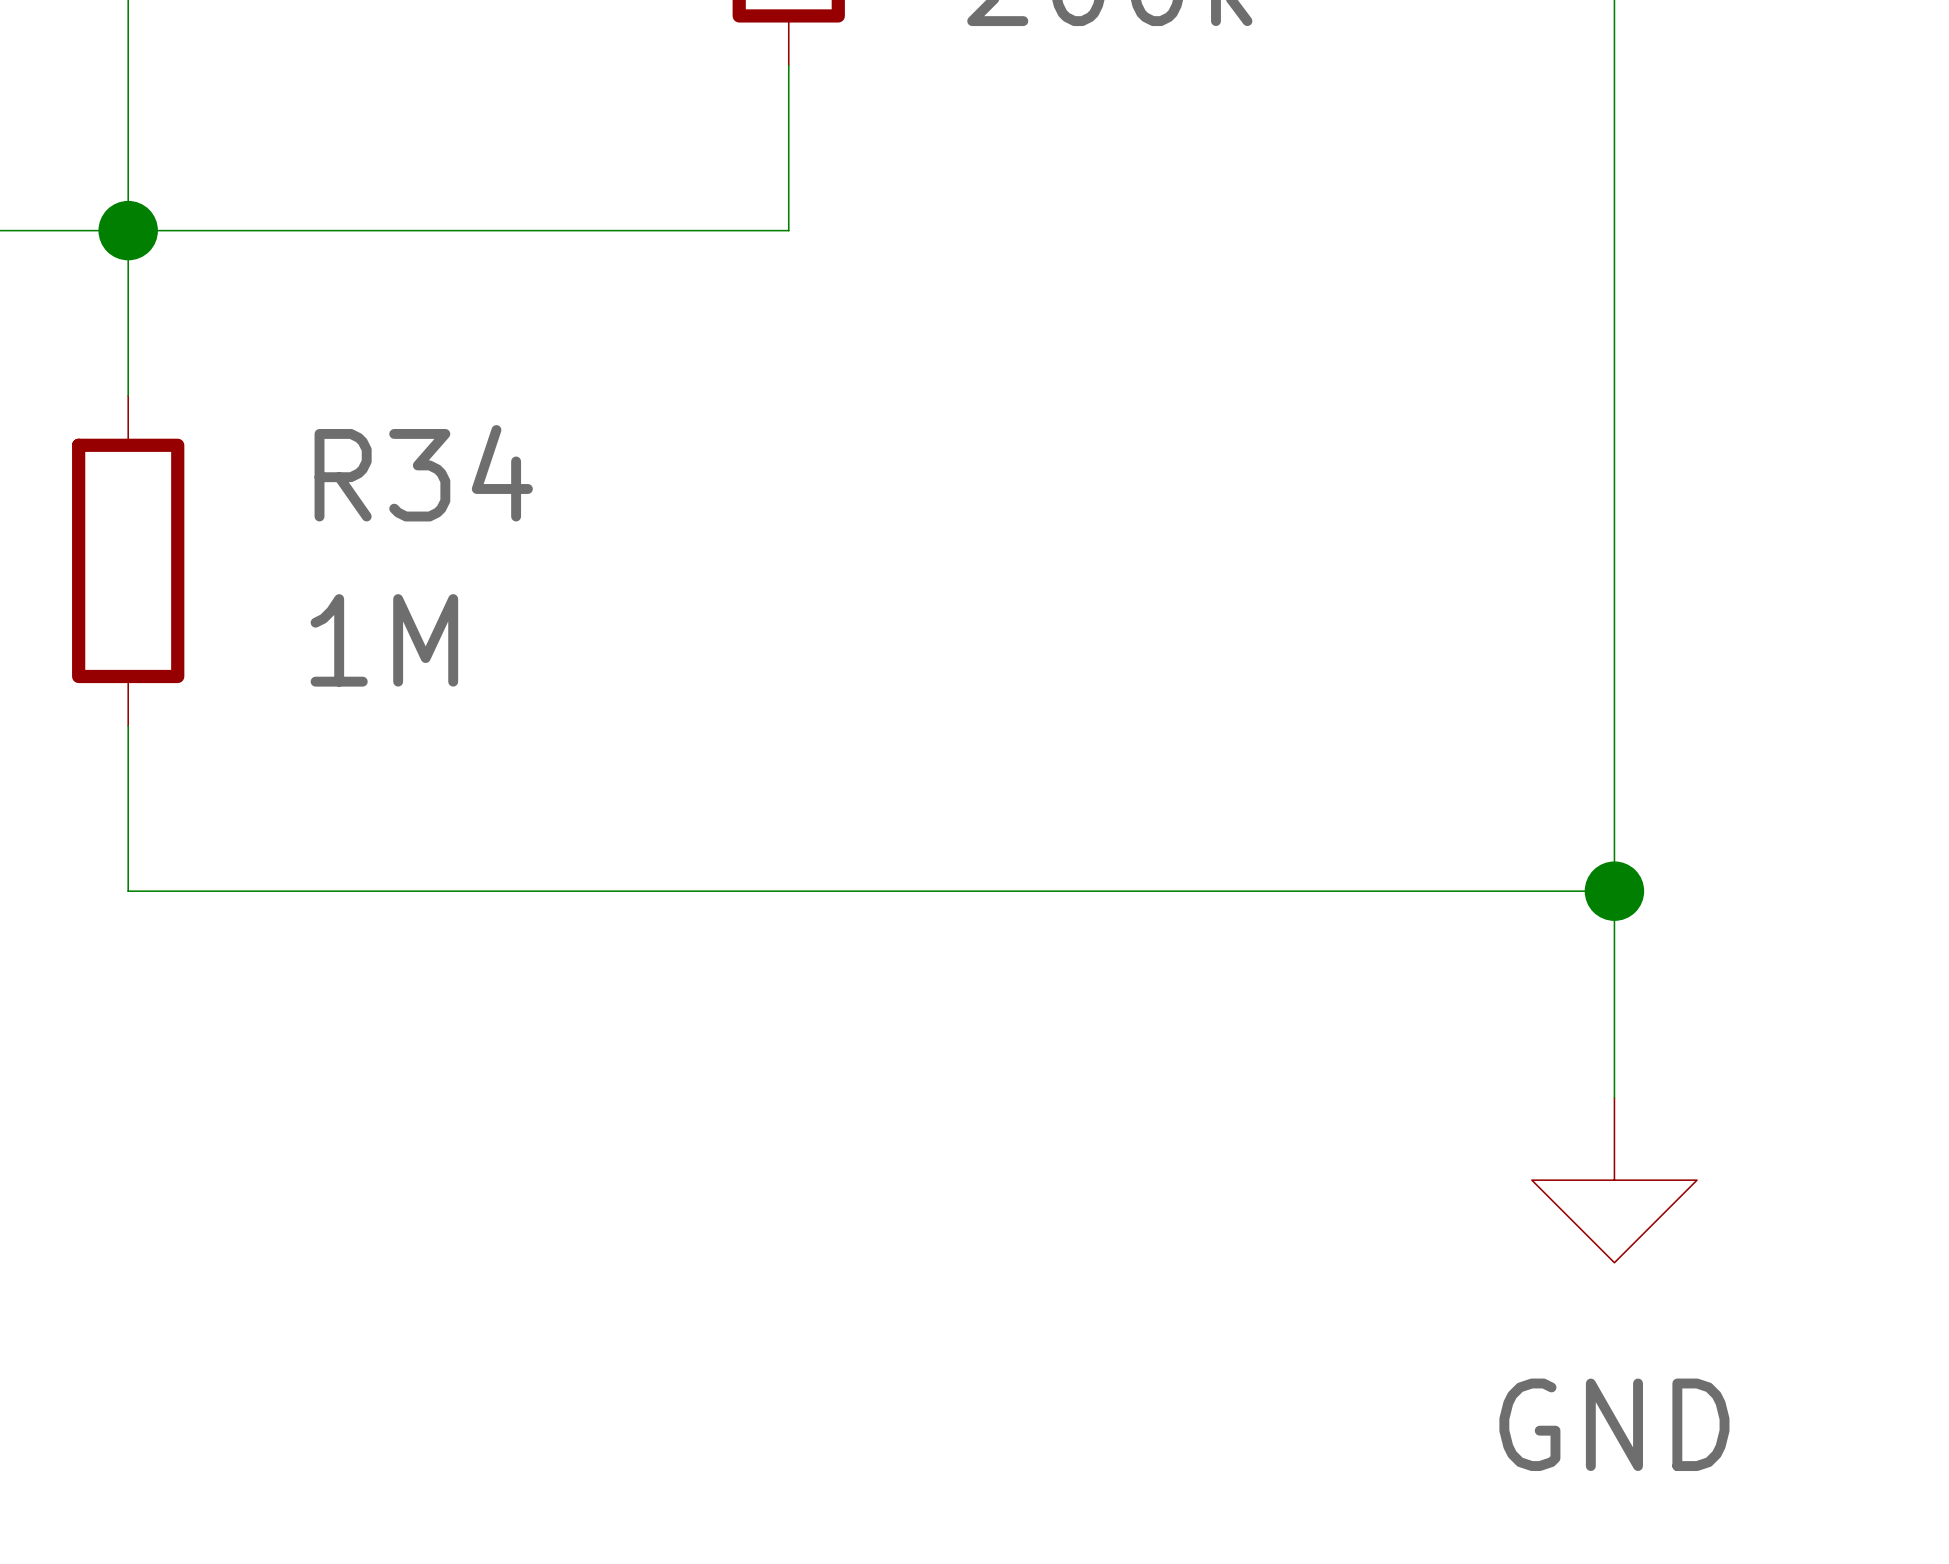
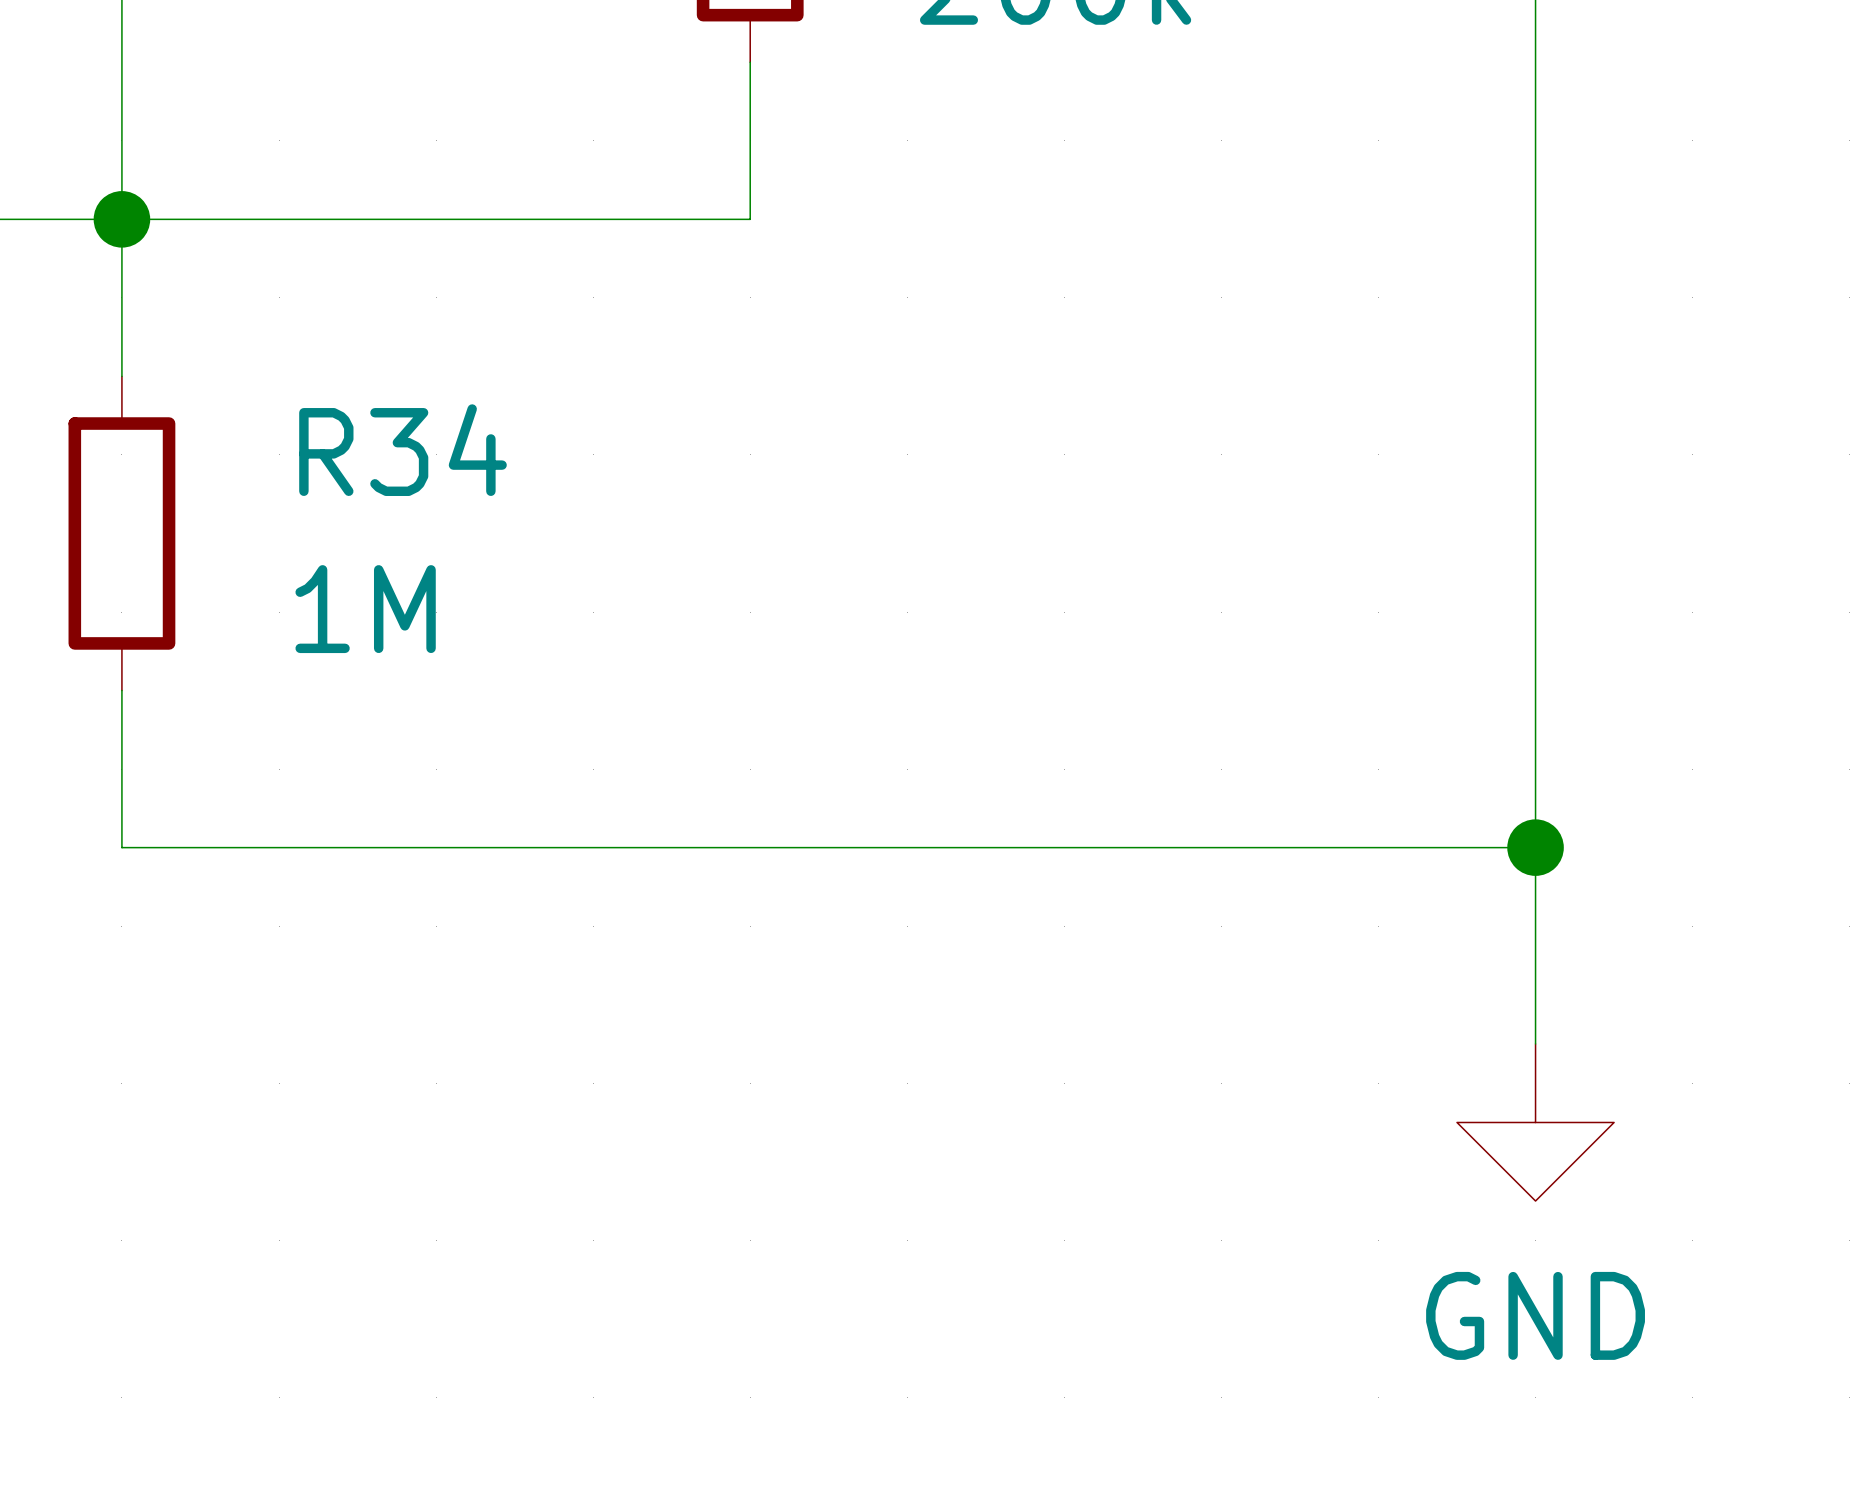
power symbol text position: GND (1614, 1424) -> GND (1535, 1315)

